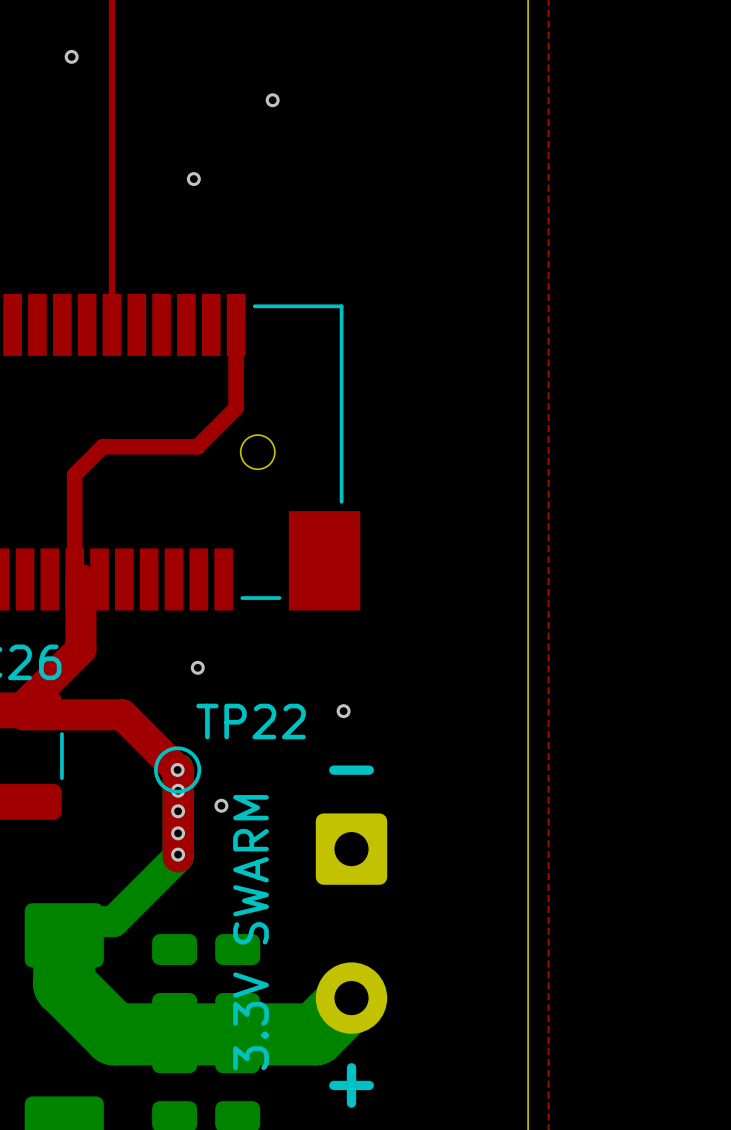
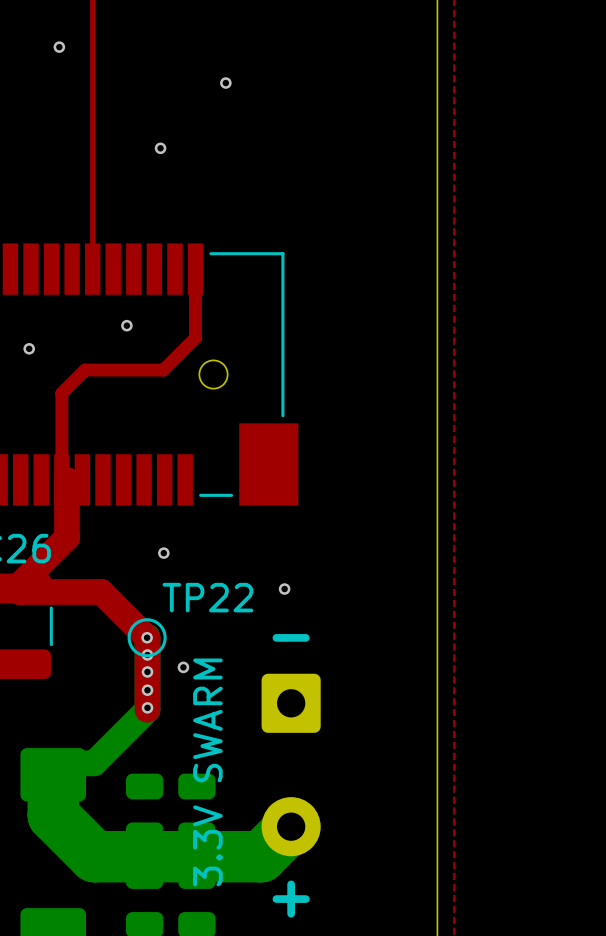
via: none -> (126, 325)
via: none -> (29, 348)

